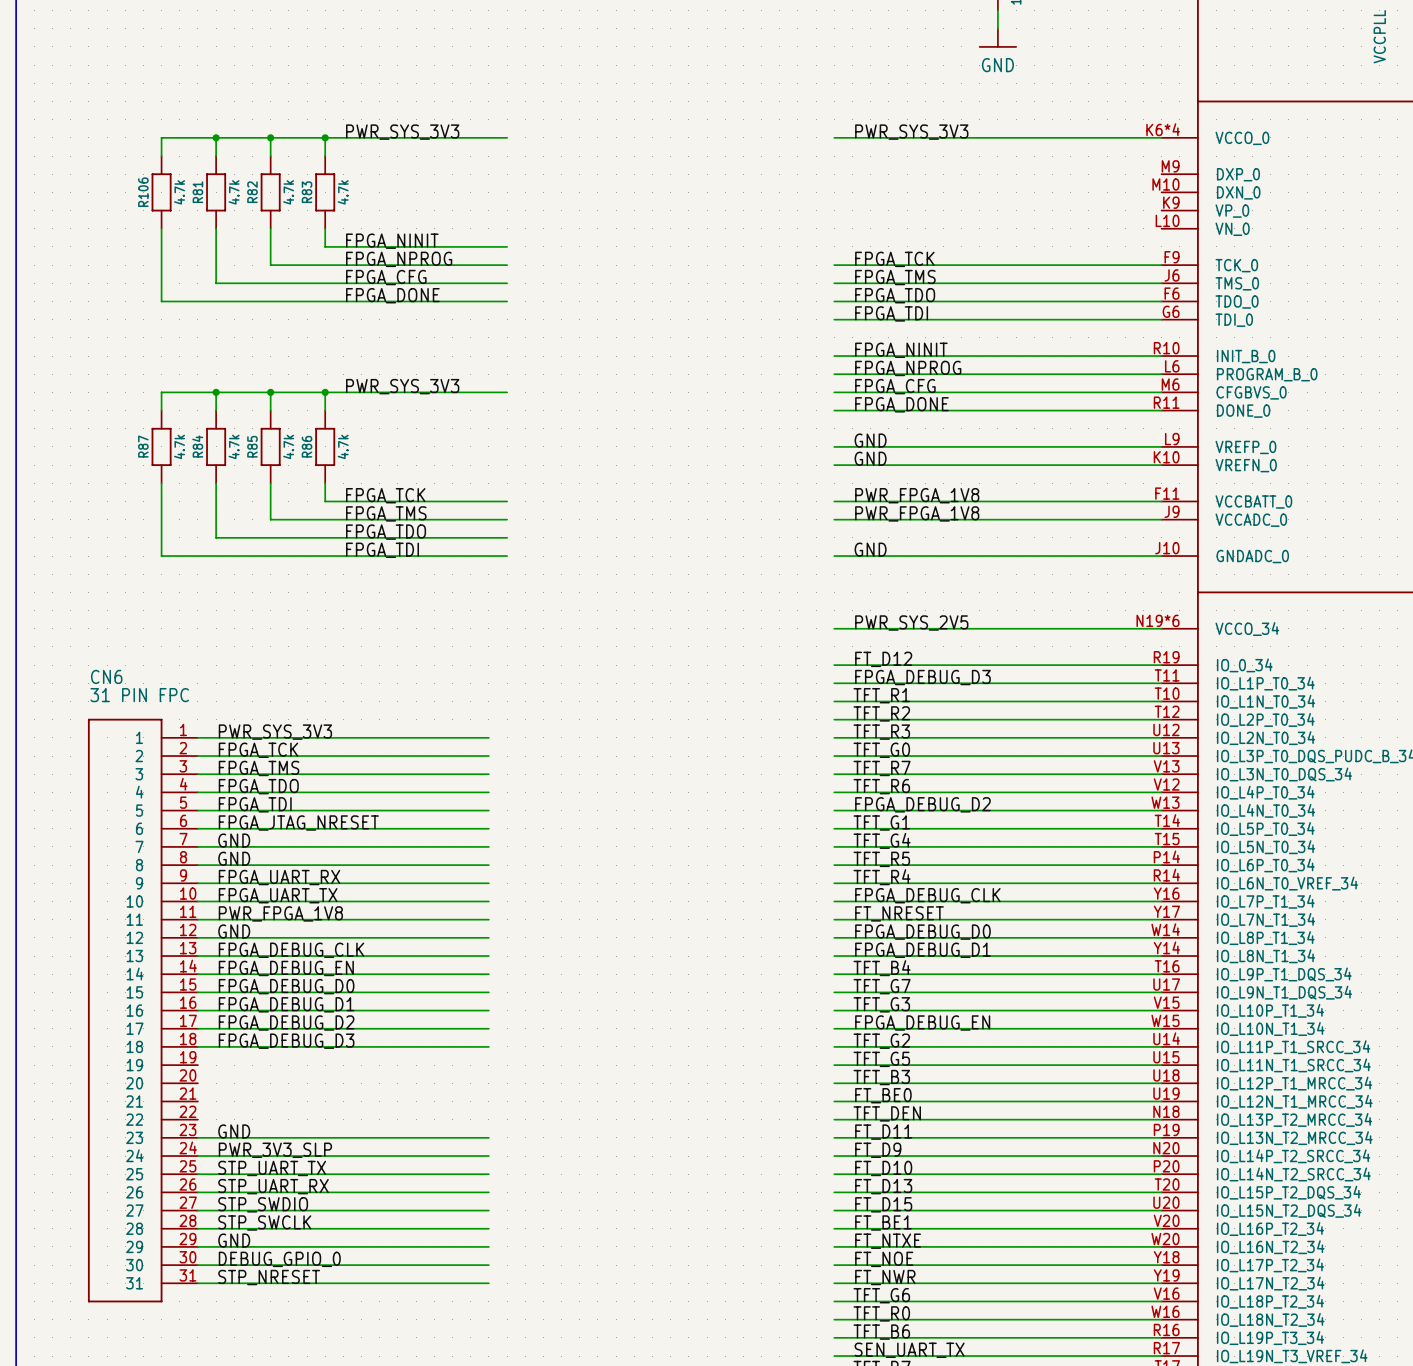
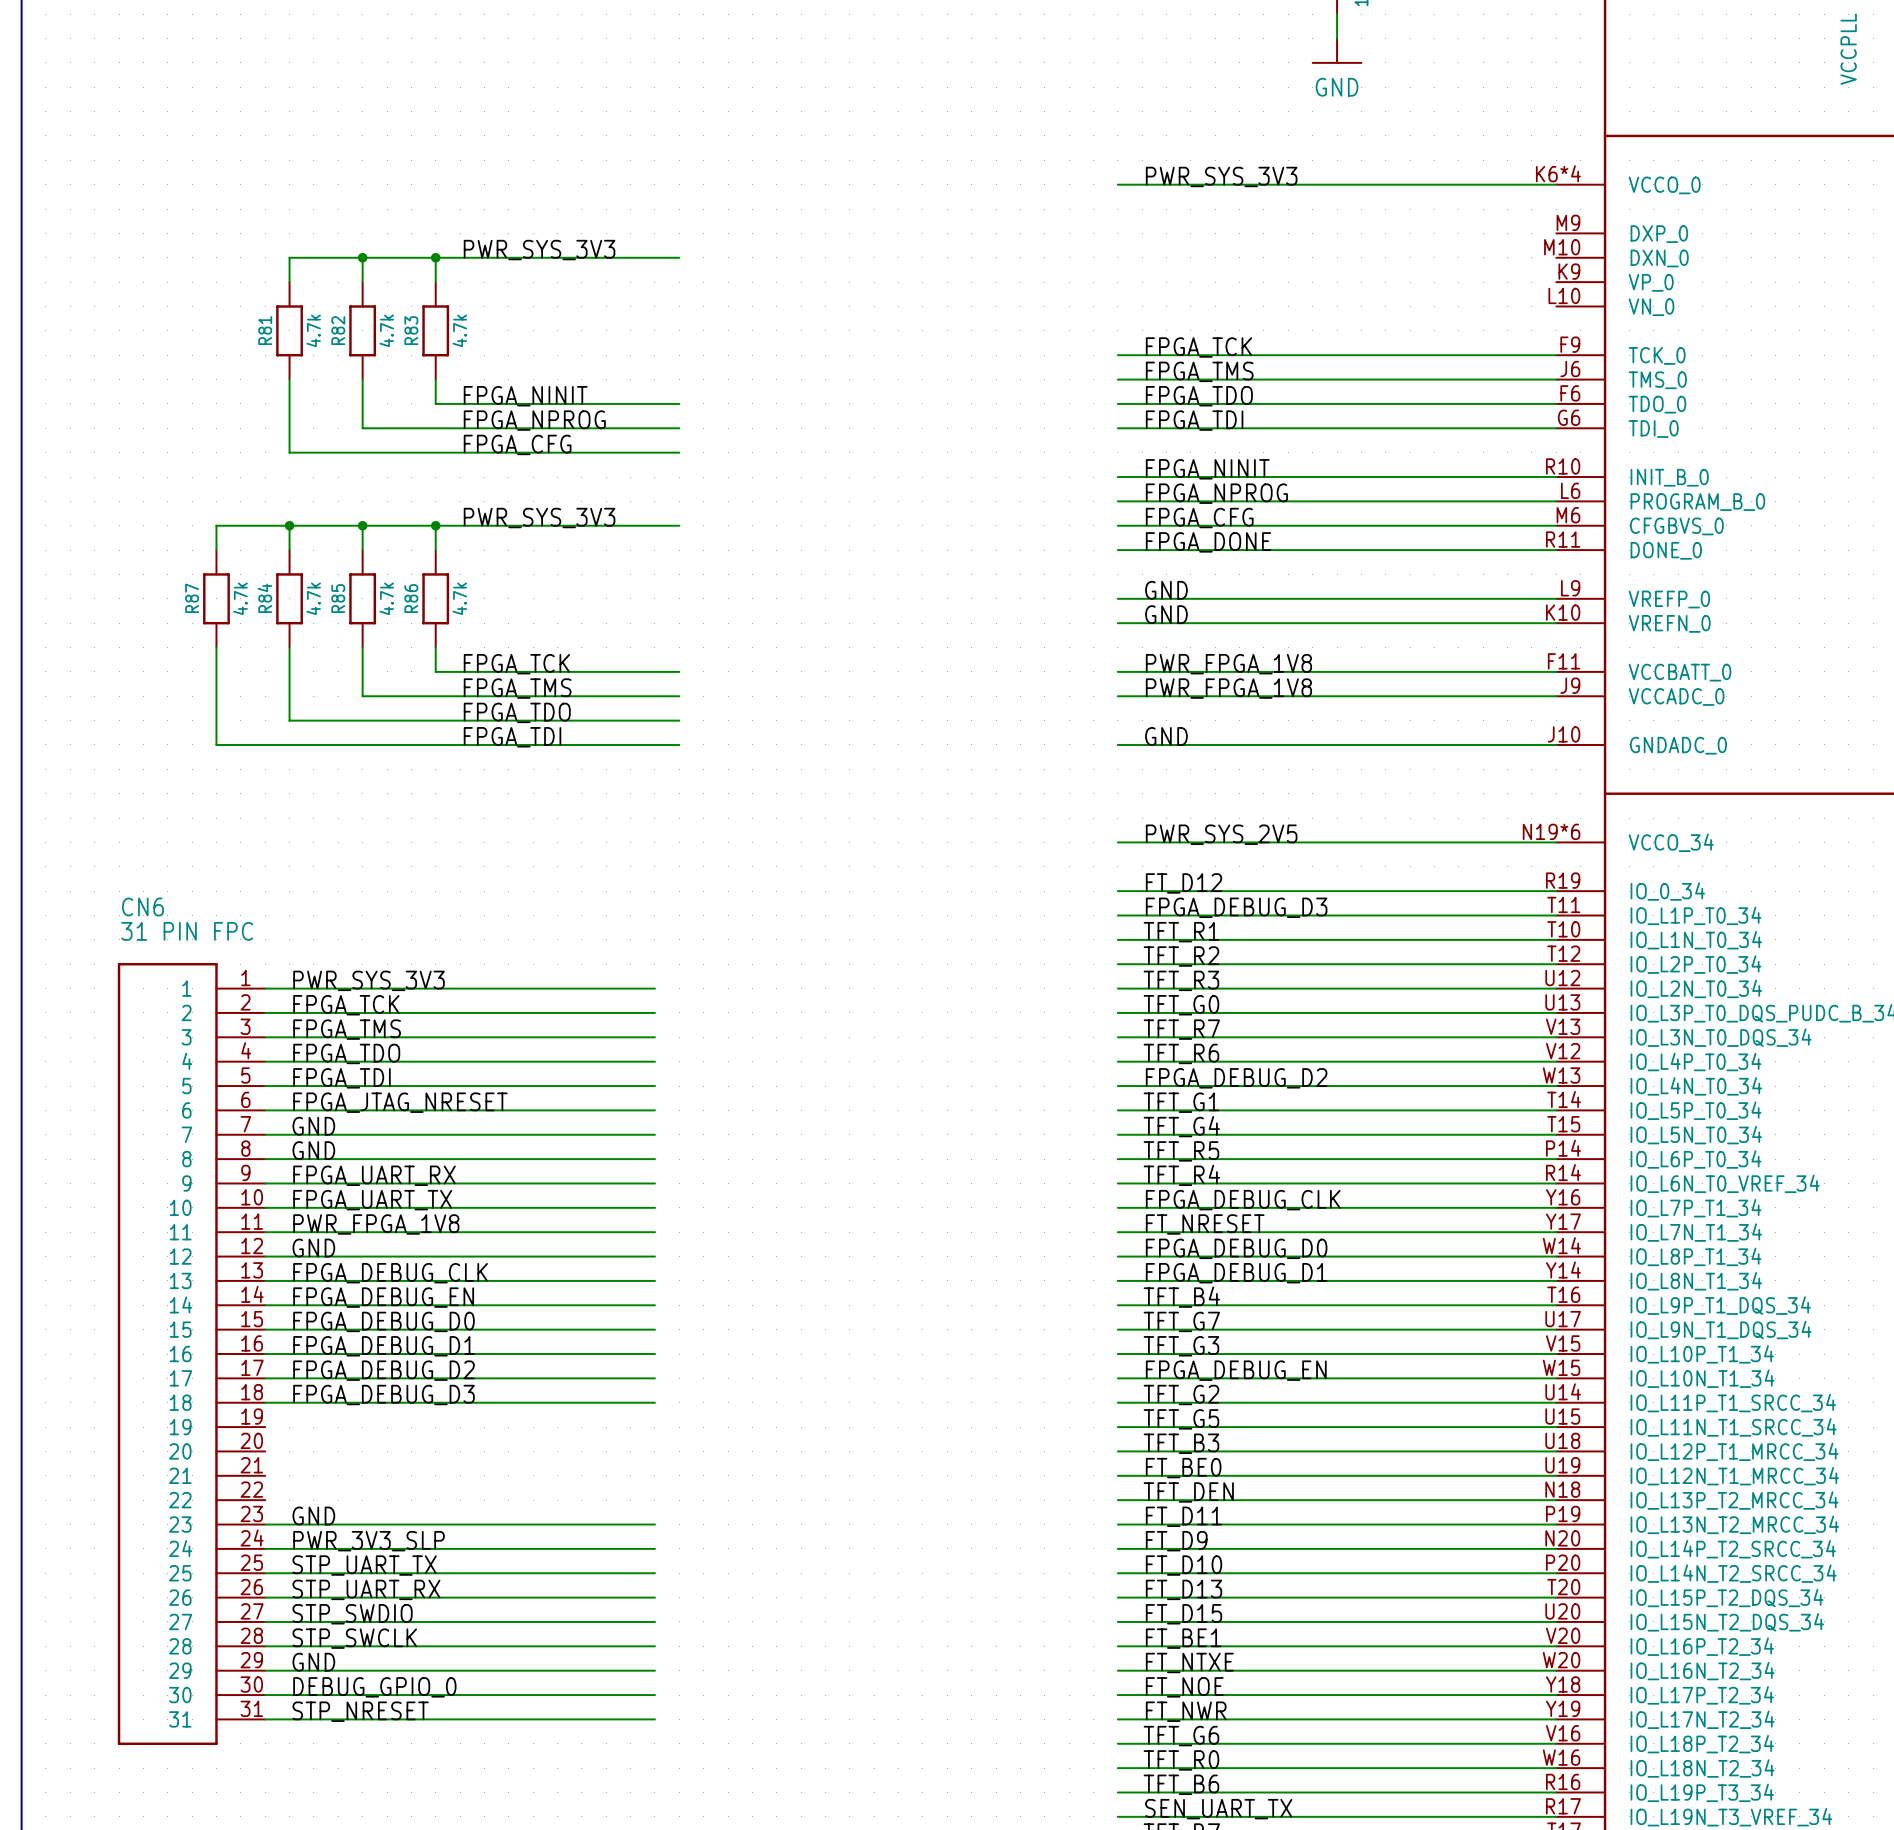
label position: PWR_SYS_3V3 (402, 132) -> PWR_SYS_3V3 (539, 250)
wire: (216, 137) (216, 156) -> none
junction: (216, 137) -> none
wire: (270, 137) (270, 156) -> (362, 257) (362, 282)
junction: (270, 137) -> none
wire: (325, 137) (325, 156) -> (435, 257) (435, 282)
junction: (325, 137) -> none
wire: (507, 137) (161, 137) (161, 156) -> none
R106: 4.7k (161, 192) -> none
R81 position: (216, 192) -> (289, 330)
R82 position: (270, 192) -> (362, 330)
junction: none -> (362, 257)
R83 position: (325, 192) -> (435, 330)
junction: none -> (435, 257)
wire: none -> (679, 257) (289, 257) (289, 282)
wire: (161, 228) (161, 301) (325, 301) -> (435, 379) (435, 403)
wire: (216, 228) (216, 283) (507, 283) -> (289, 379) (289, 452) (679, 452)
wire: (270, 228) (270, 265) (507, 265) -> (362, 379) (362, 428) (679, 428)
wire: (325, 228) (325, 246) (507, 246) -> none
label: FPGA_NINIT (392, 241) -> none
label position: FPGA_NPROG (399, 259) -> FPGA_NPROG (534, 420)
label position: FPGA_CFG (386, 277) -> FPGA_CFG (517, 444)
label: FPGA_DONE (392, 295) -> FPGA_NINIT (525, 396)

